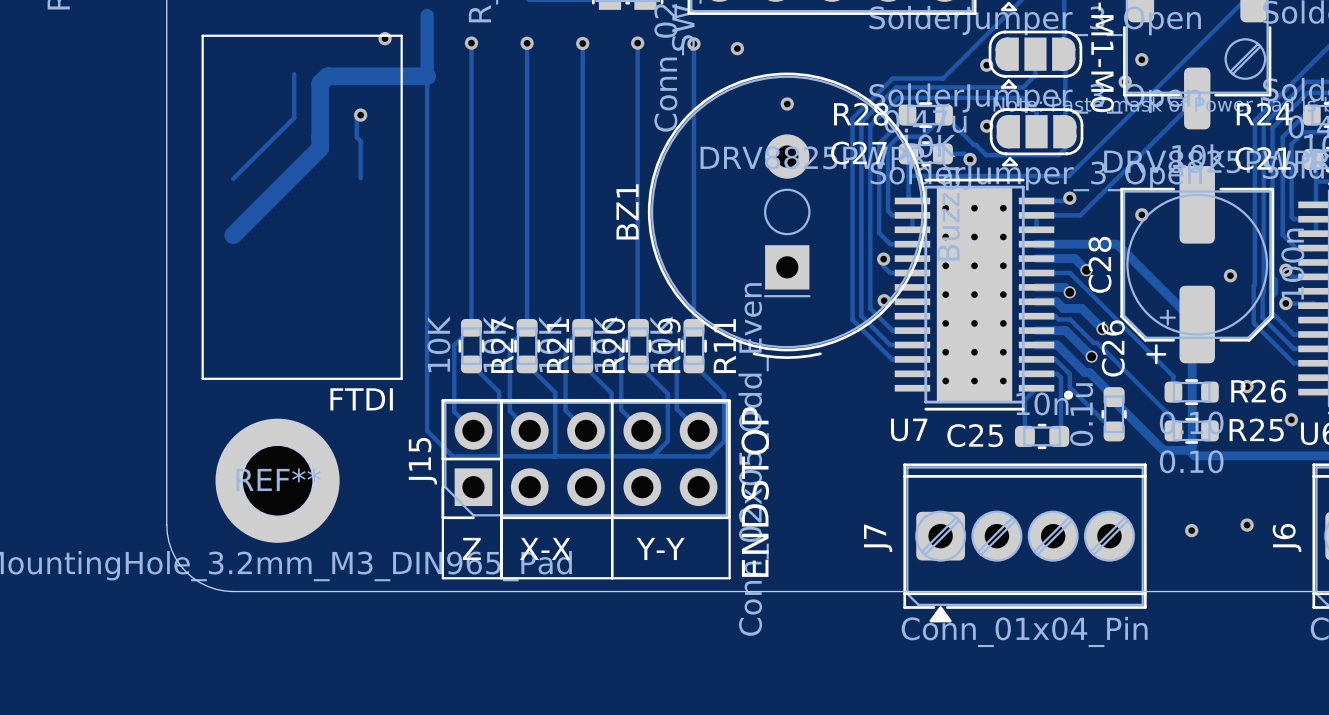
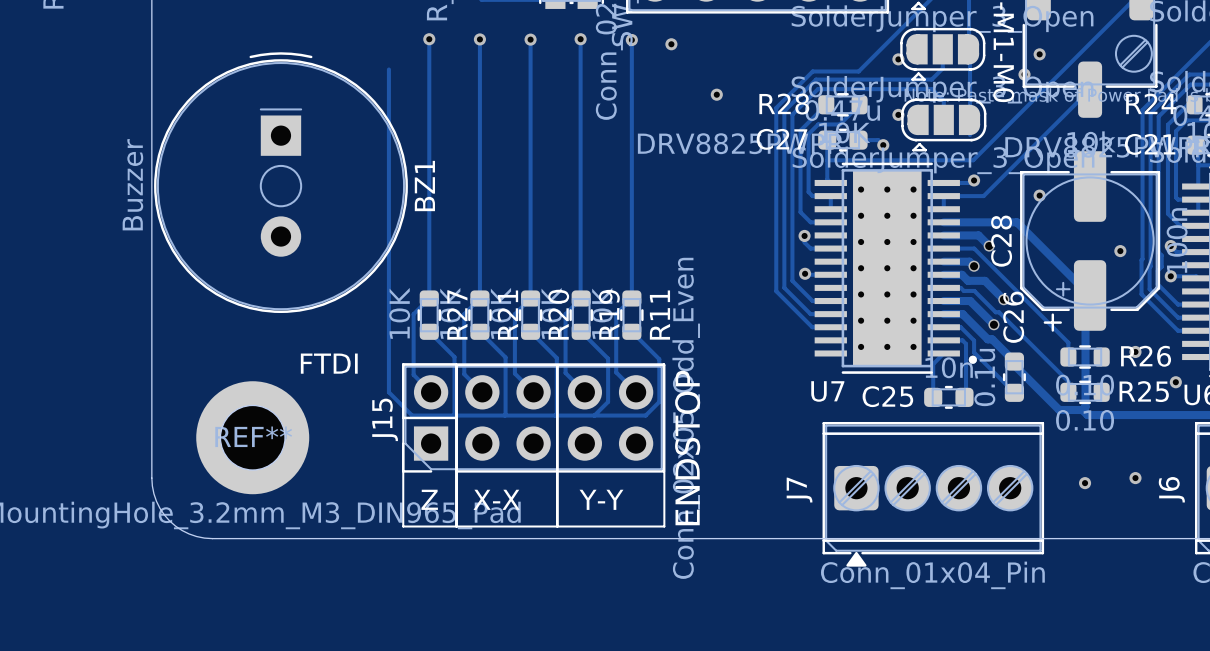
track: (427, 15) (427, 76) (327, 76) (320, 83) (320, 148) (233, 235) -> none
line: (202, 35) (401, 35) (401, 378) (202, 378) (202, 35) -> none
via: (385, 38) -> none
track: (294, 74) (294, 117) (233, 178) -> none
track: (360, 115) (356, 118) (356, 137) (360, 141) (360, 178) -> none
via: (360, 115) -> none
track: (944, 115) (986, 155) (1058, 155) (1065, 148) -> none
BZ1 rotation: 0° (787, 215) -> 180° (280, 182)
BZ1 position: (787, 215) -> (280, 182)

